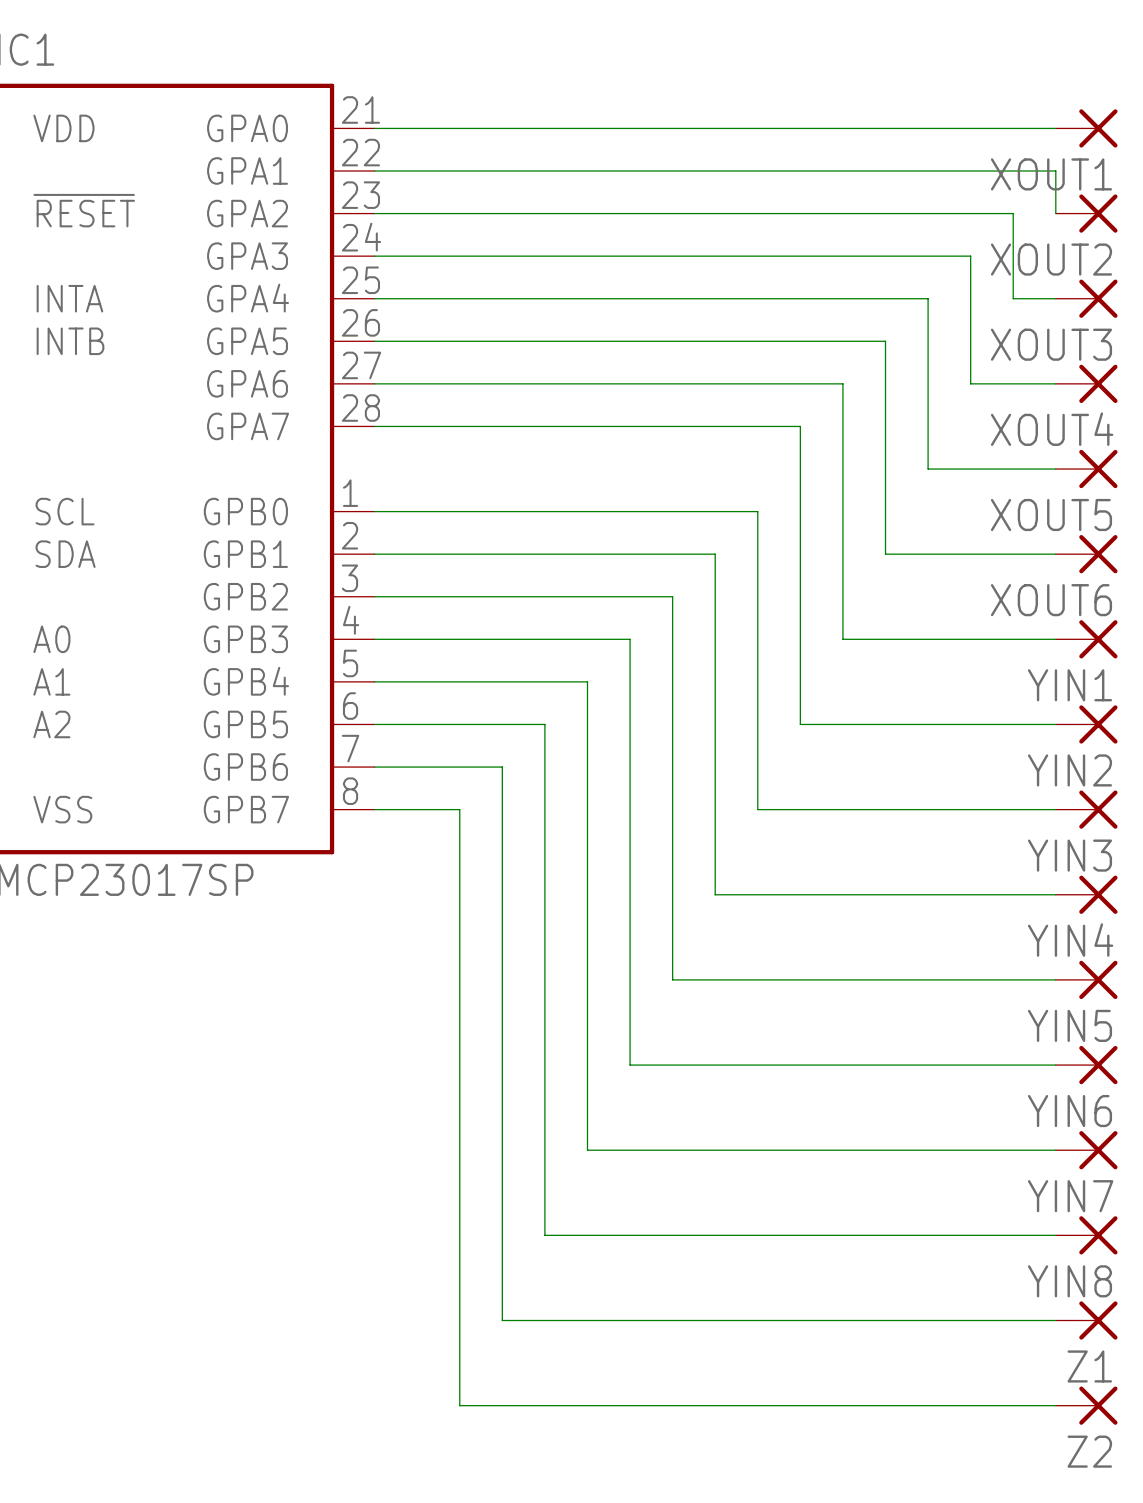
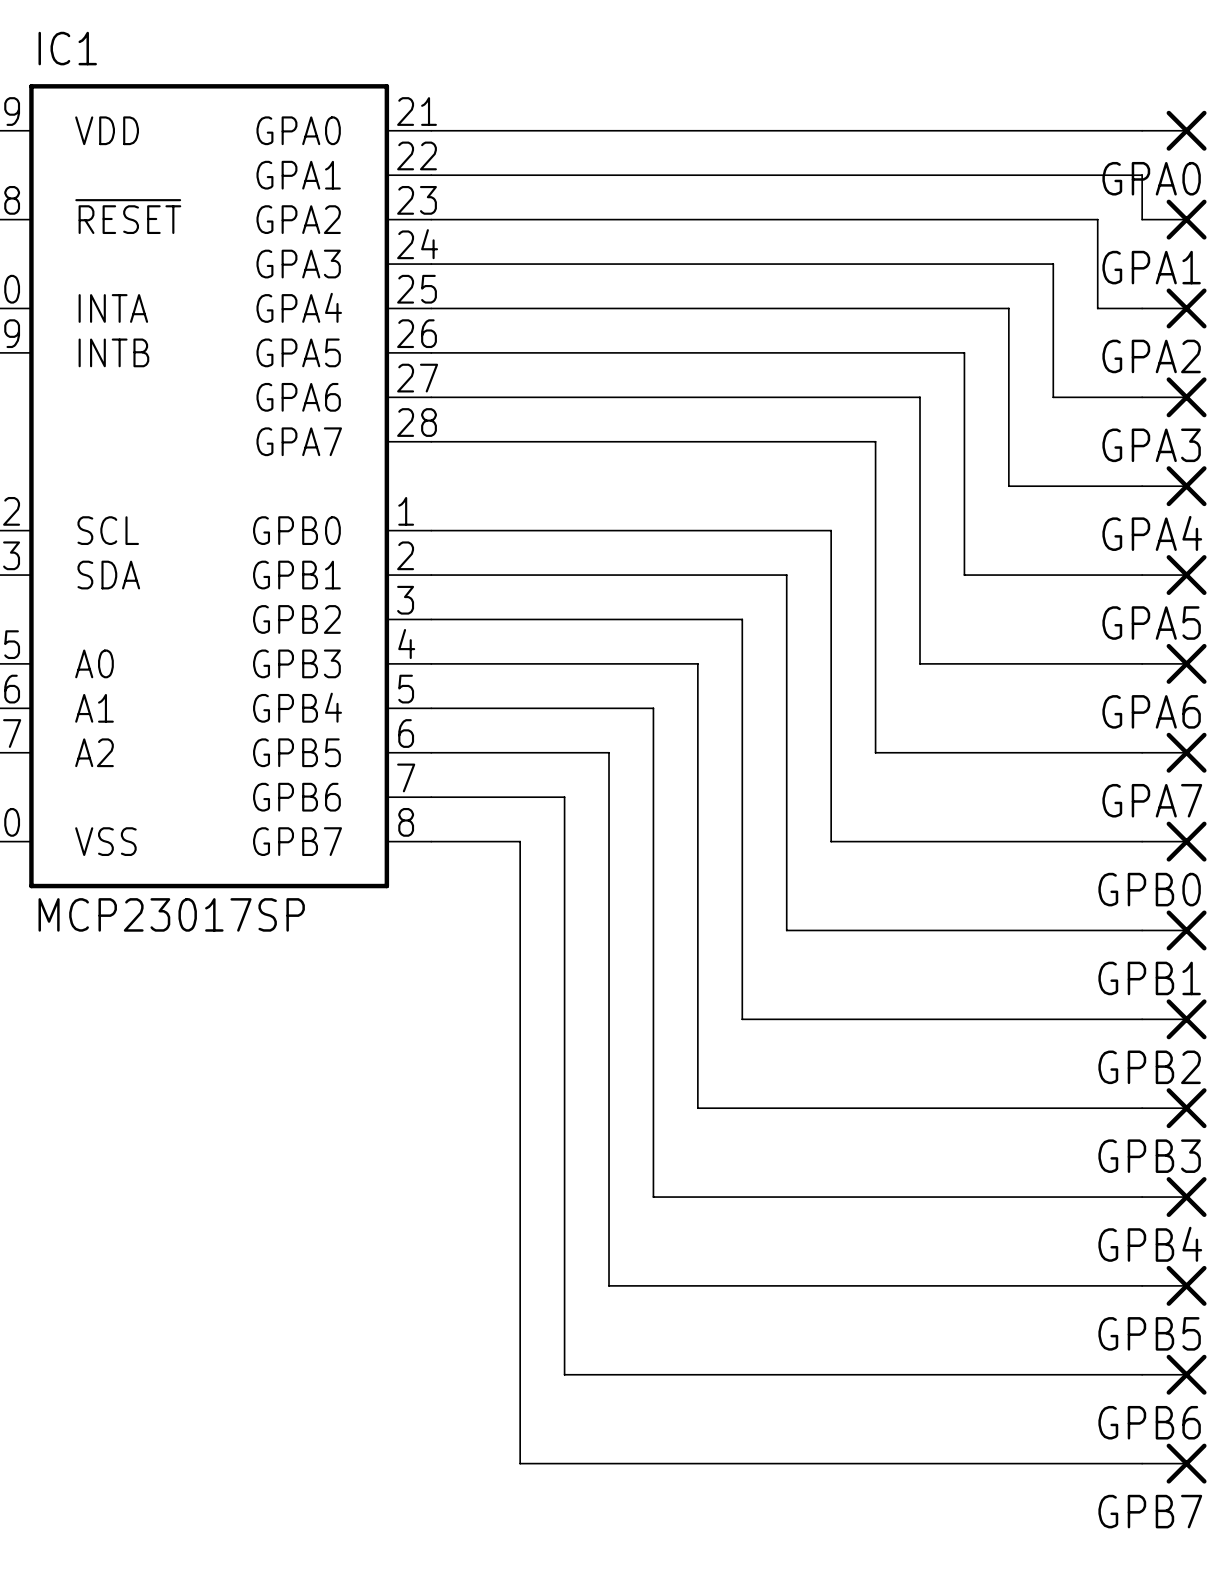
XOUT1 name: XOUT1 (1051, 174) -> GPA0 (1151, 178)
XOUT2 name: XOUT2 (1051, 259) -> GPA1 (1151, 267)
XOUT3 name: XOUT3 (1051, 344) -> GPA2 (1151, 356)
XOUT4 name: XOUT4 (1052, 429) -> GPA3 (1151, 445)
XOUT5 name: XOUT5 (1051, 515) -> GPA4 (1152, 533)
XOUT6 name: XOUT6 (1051, 600) -> GPA5 (1151, 623)
YIN1 name: YIN1 (1069, 685) -> GPA6 (1151, 711)
YIN2 name: YIN2 (1069, 770) -> GPA7 (1152, 800)
YIN3 name: YIN3 (1069, 855) -> GPB0 (1149, 889)
YIN4 name: YIN4 (1070, 940) -> GPB1 (1149, 978)
YIN5 name: YIN5 (1069, 1025) -> GPB2 (1149, 1067)
YIN6 name: YIN6 (1069, 1111) -> GPB3 (1149, 1156)
YIN7 name: YIN7 (1070, 1196) -> GPB4 (1150, 1244)
YIN8 name: YIN8 (1069, 1281) -> GPB5 (1149, 1333)
Z1 name: Z1 (1089, 1366) -> GPB6 (1149, 1422)
Z2 name: Z2 (1089, 1451) -> GPB7 (1150, 1511)

